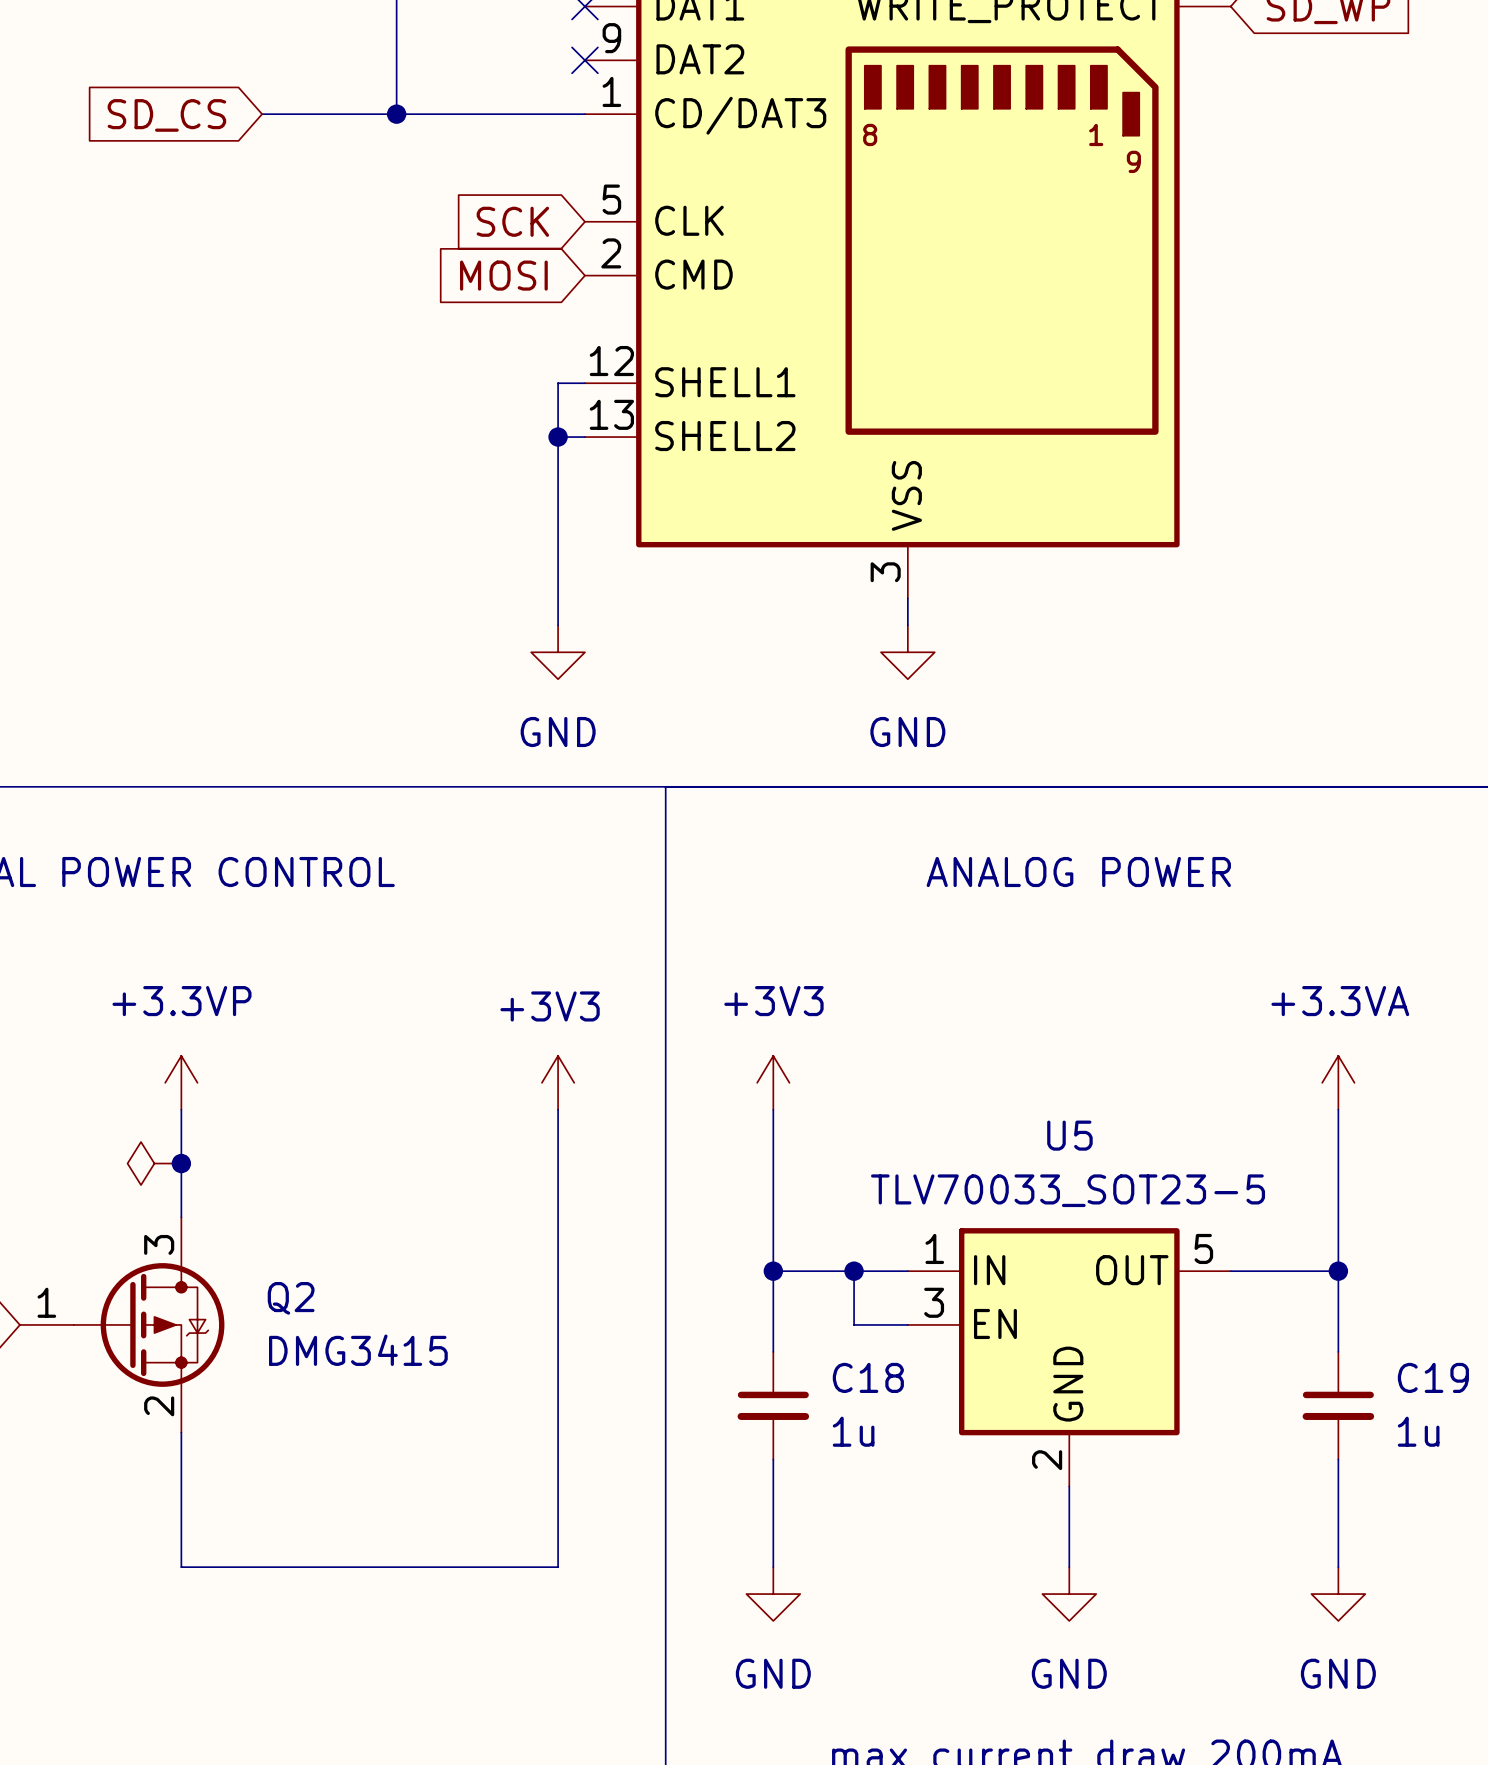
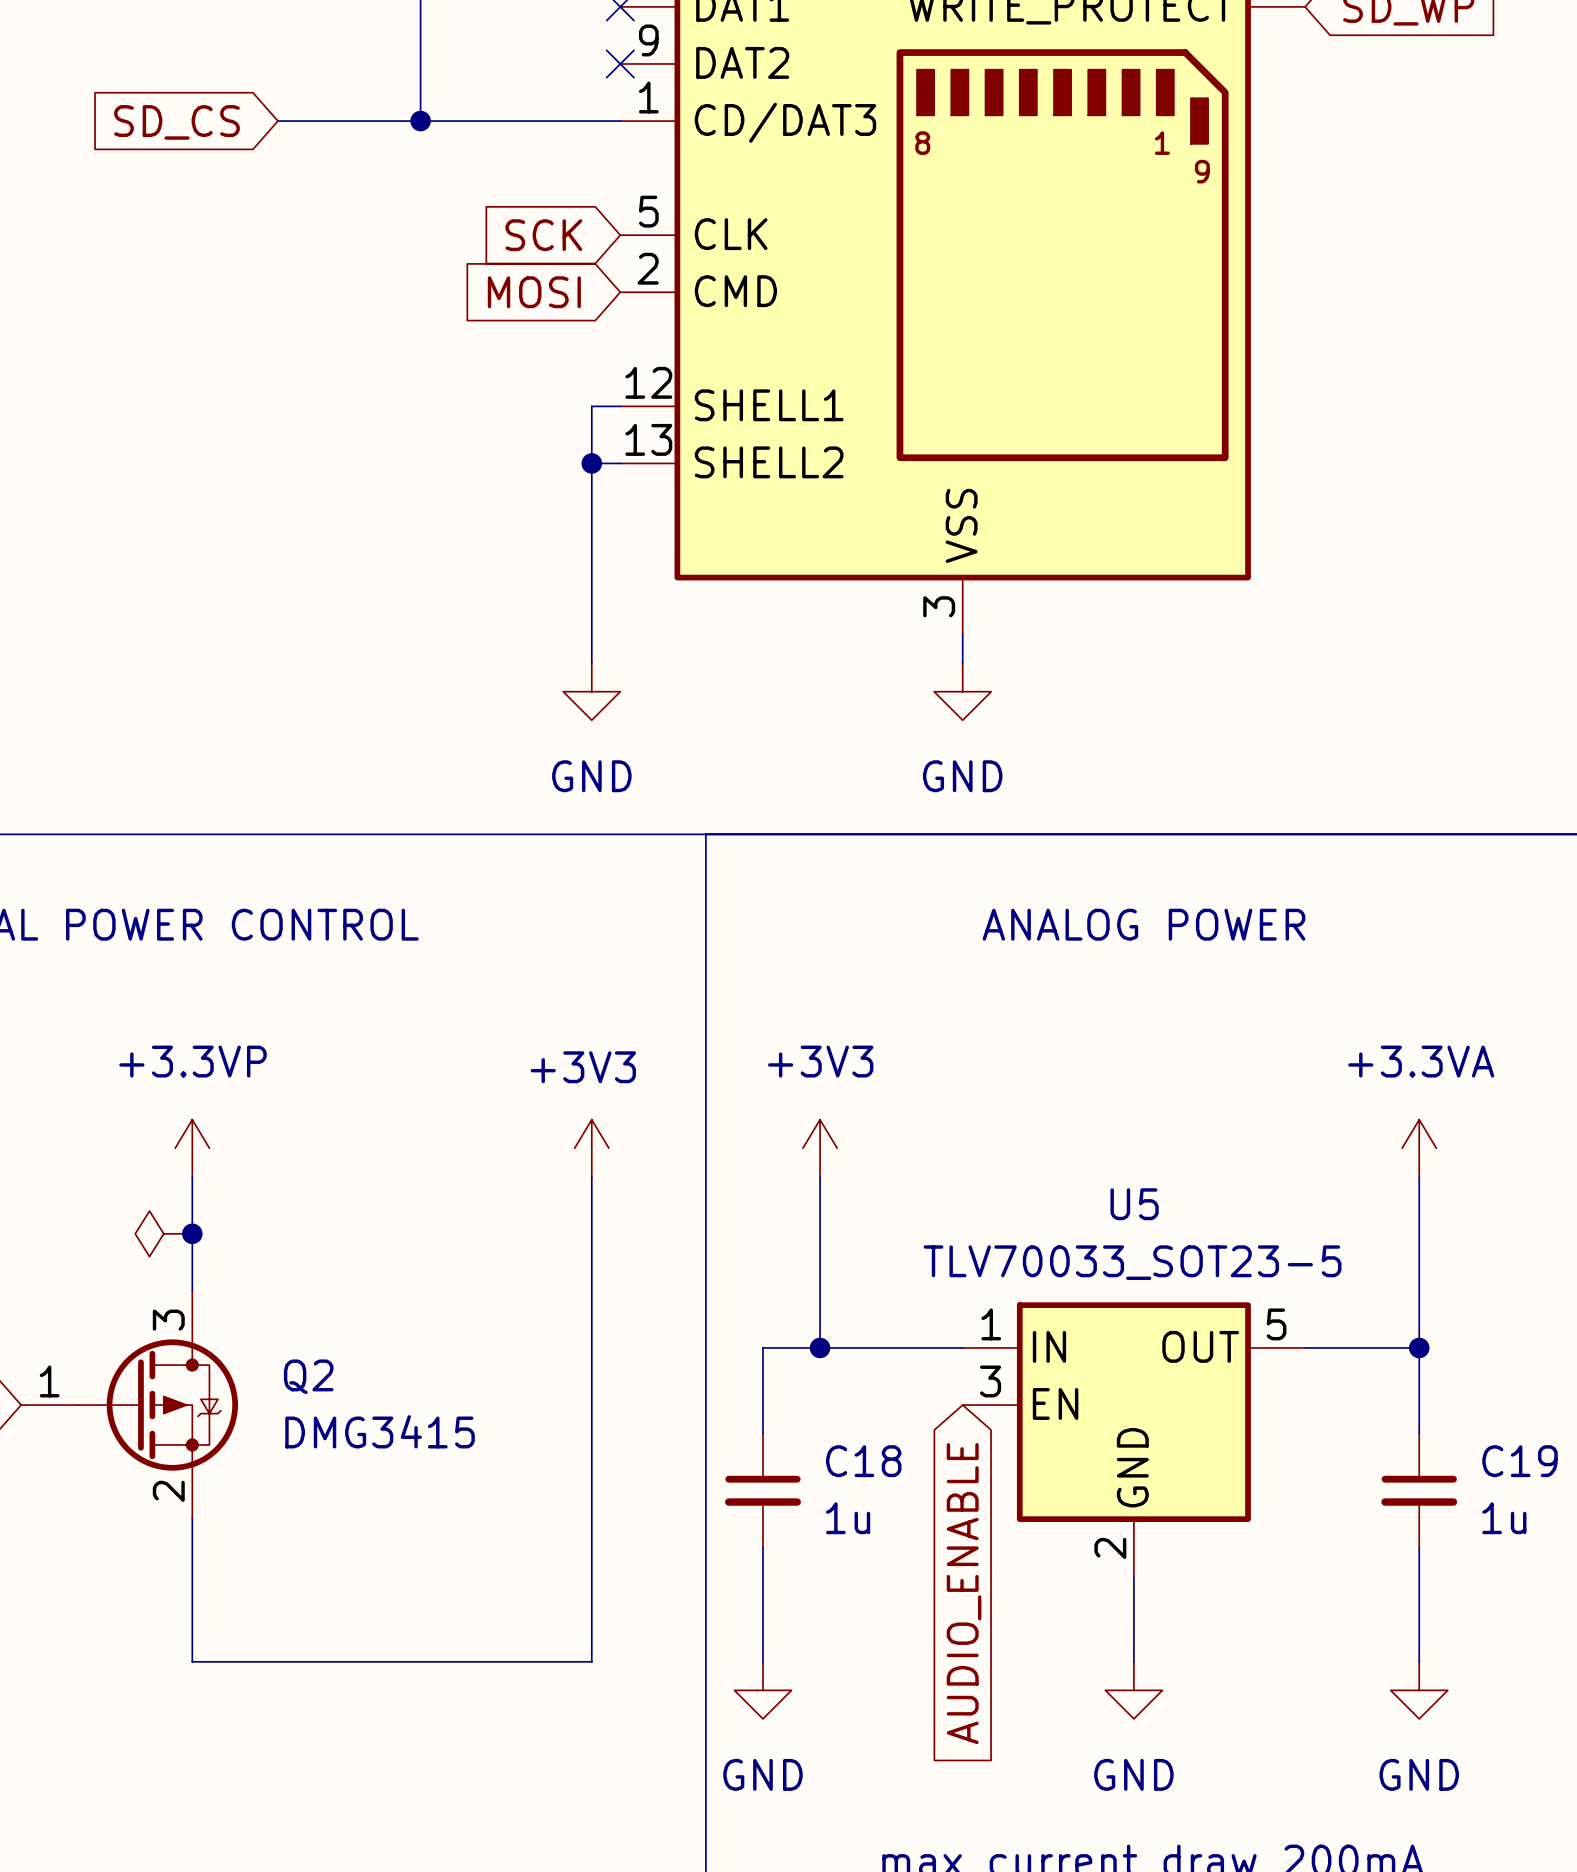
wire: (773, 1271) (773, 1351) -> (820, 1347) (762, 1347) (762, 1433)
wire: (854, 1271) (854, 1324) (907, 1324) -> none
junction: (854, 1271) -> none
C18 position: (773, 1405) -> (762, 1490)
wire: (773, 1459) (773, 1567) -> (762, 1547) (762, 1661)
global label: none -> AUDIO_ENABLE (964, 1593)
power symbol position: GND (773, 1594) -> GND (762, 1690)

